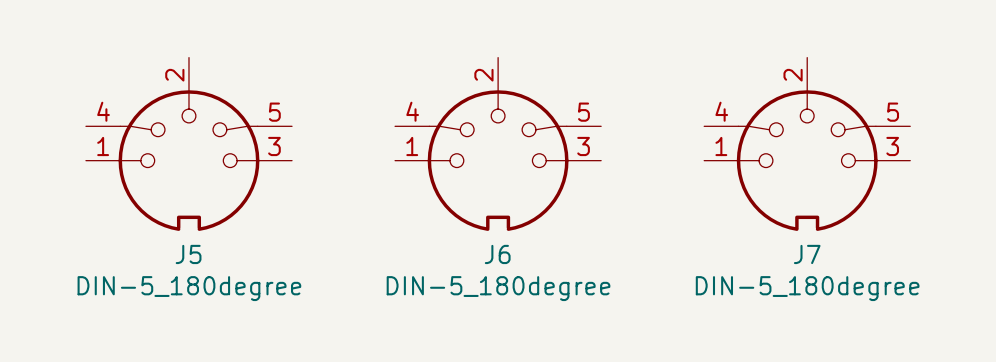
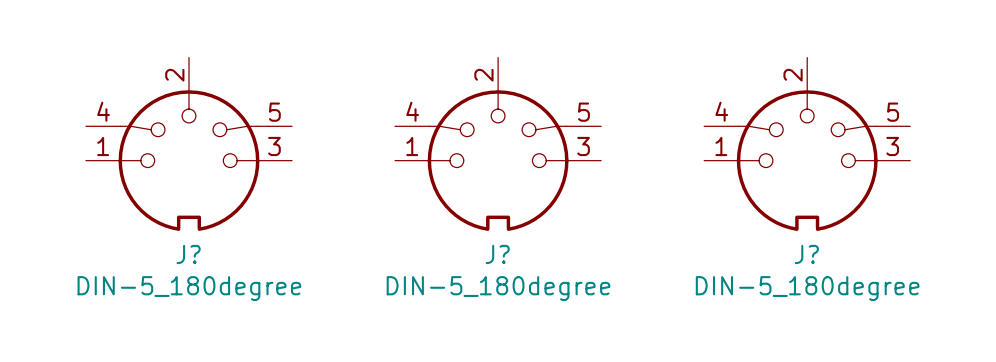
J5 name: J5 (188, 254) -> J? (188, 254)
J6 name: J6 (497, 254) -> J? (497, 254)
J7 name: J7 (807, 254) -> J? (806, 254)

